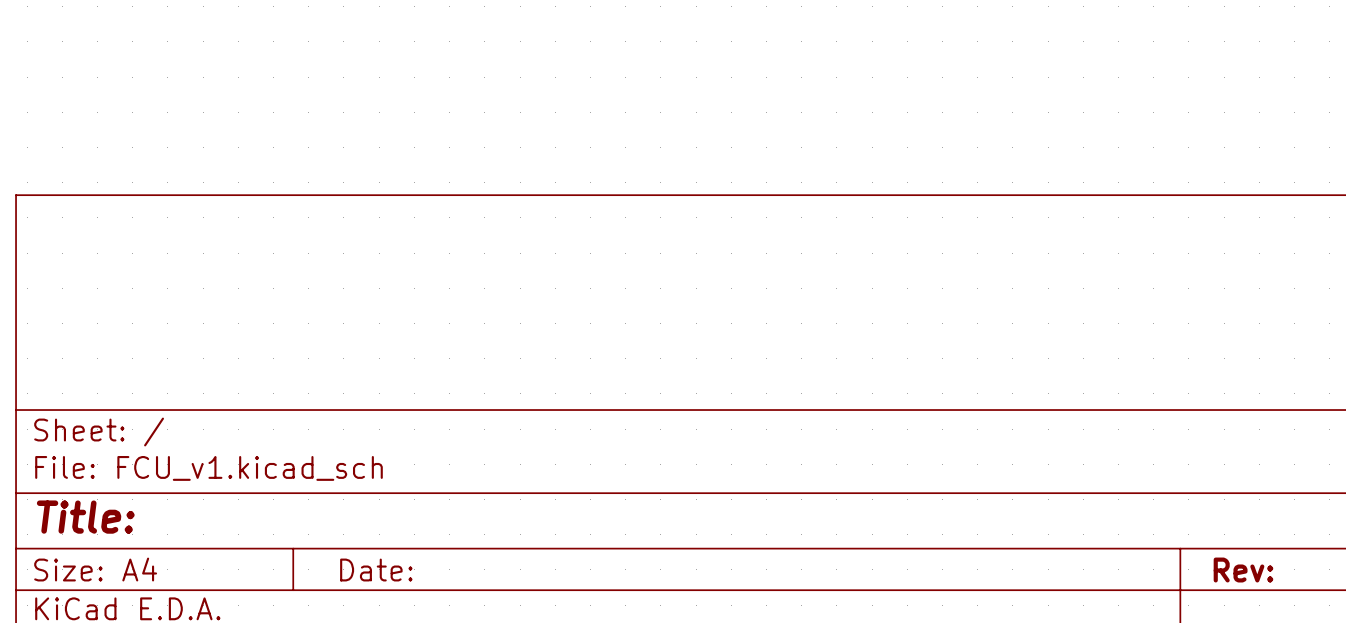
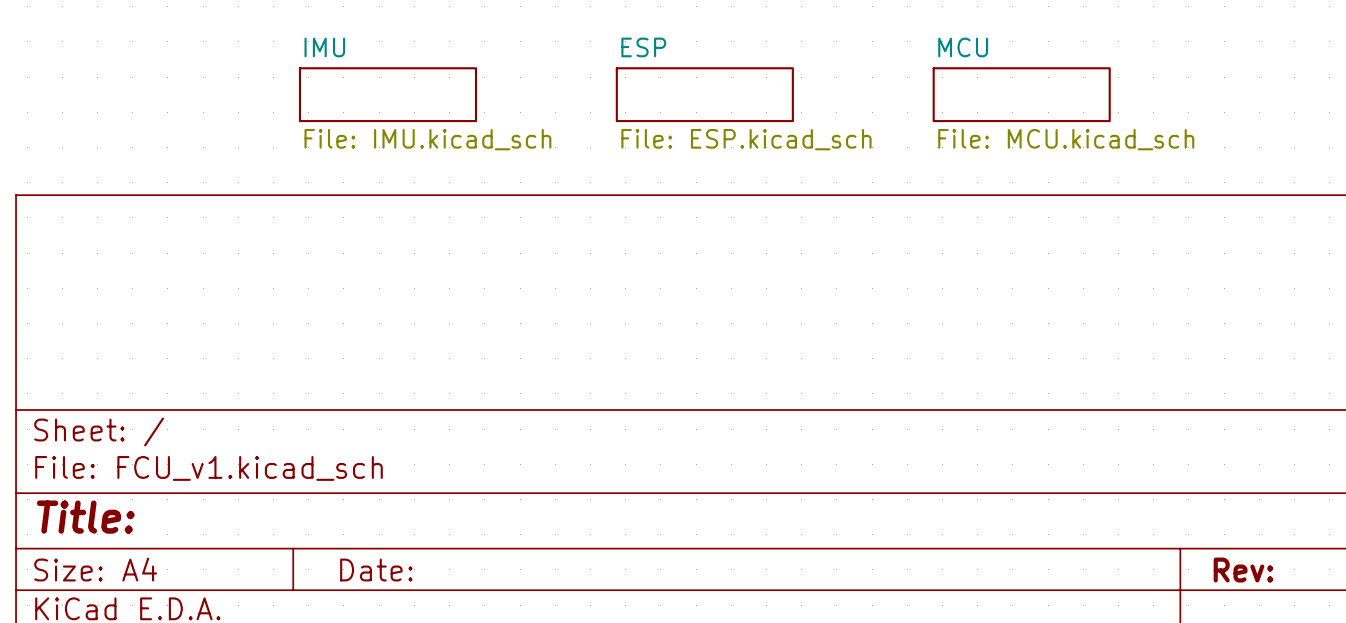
sheet IMU: none -> File: IMU.kicad_sch (387, 94)
sheet ESP: none -> File: ESP.kicad_sch (704, 94)
sheet MCU: none -> File: MCU.kicad_sch (1021, 94)

